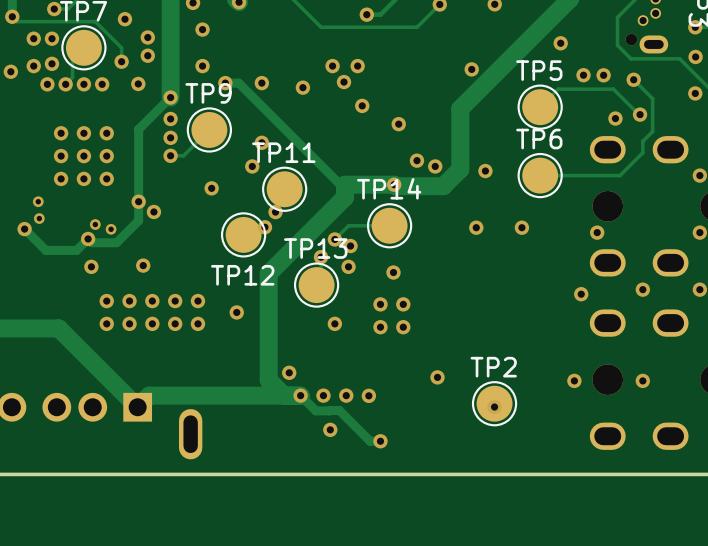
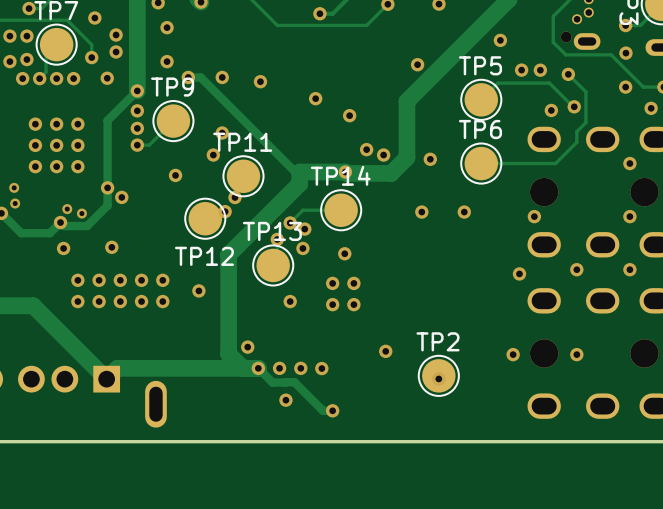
via: (332, 66) -> none
via: (357, 66) -> none
via: (343, 82) -> none

